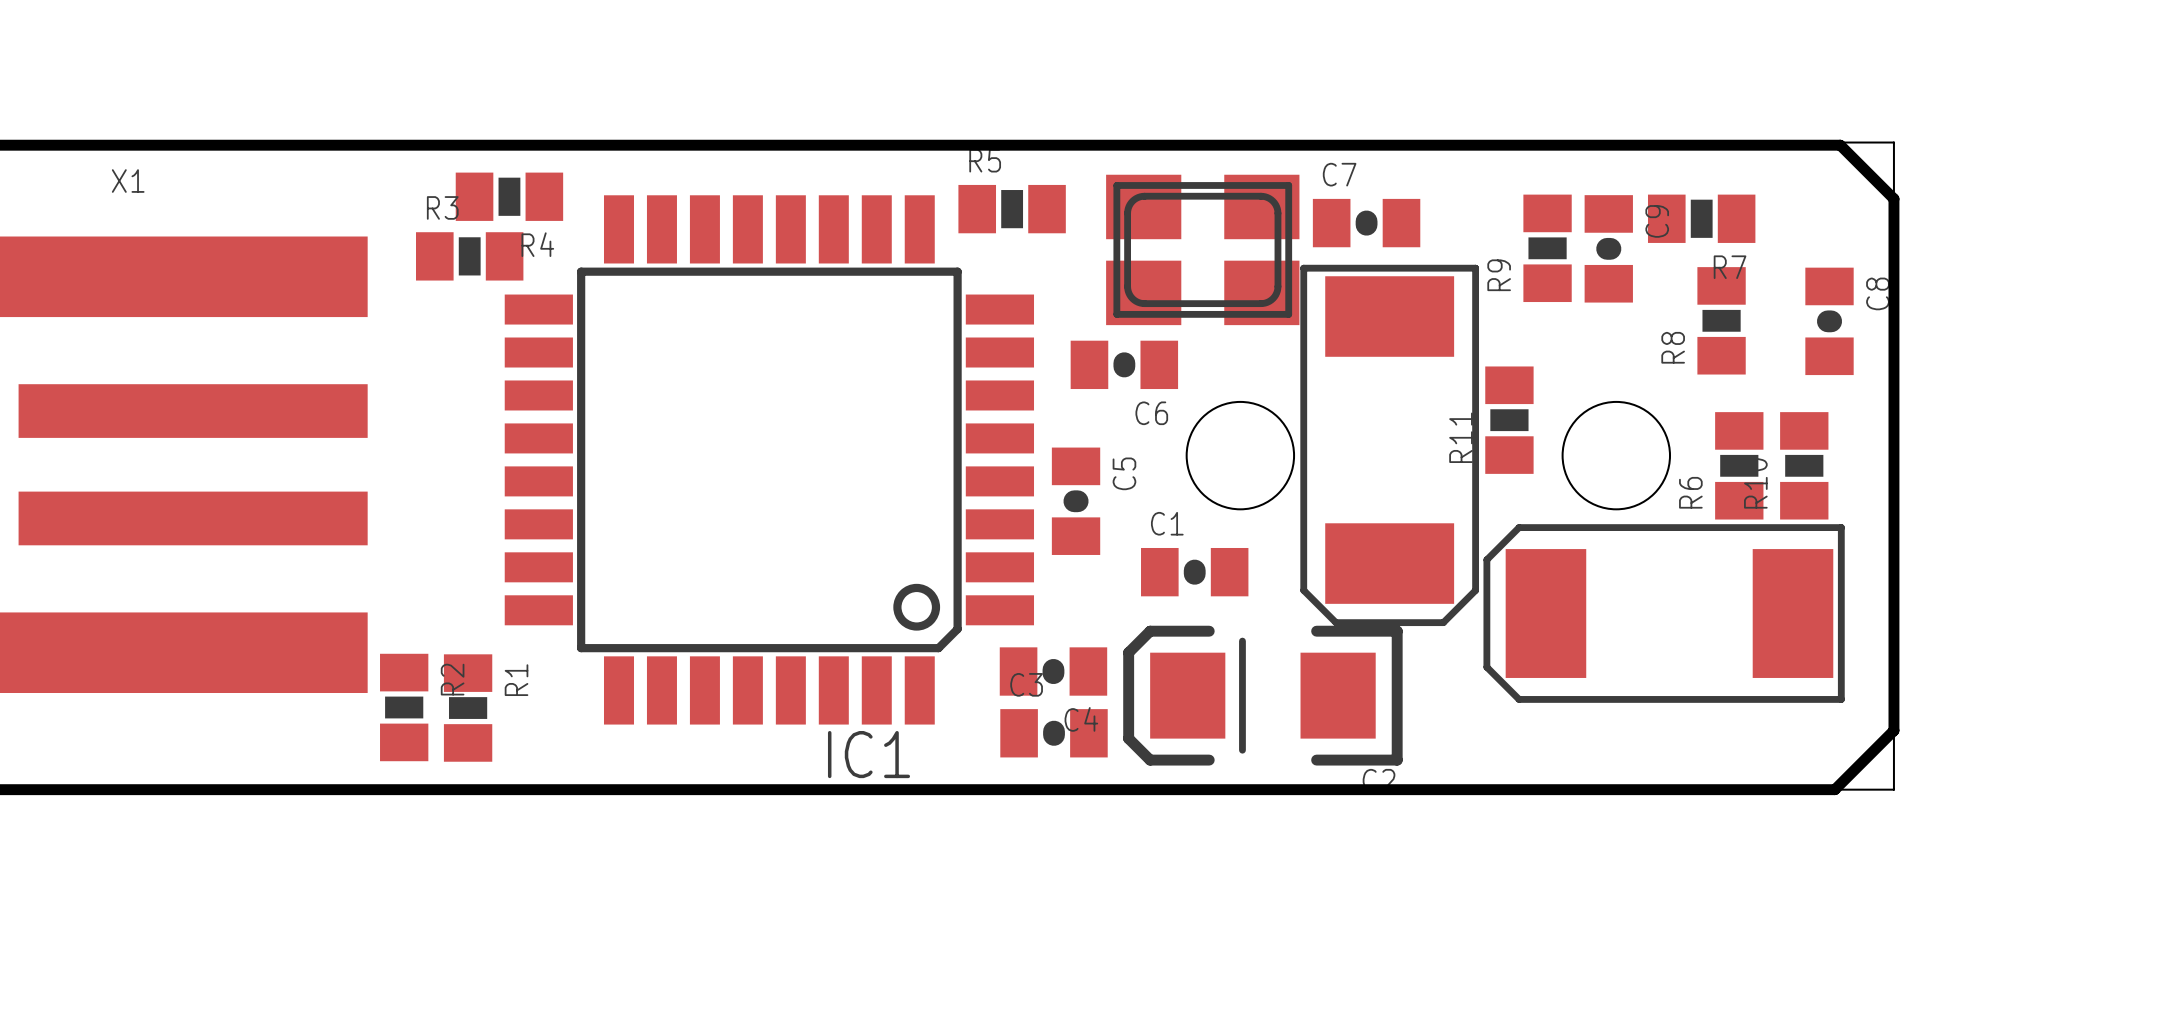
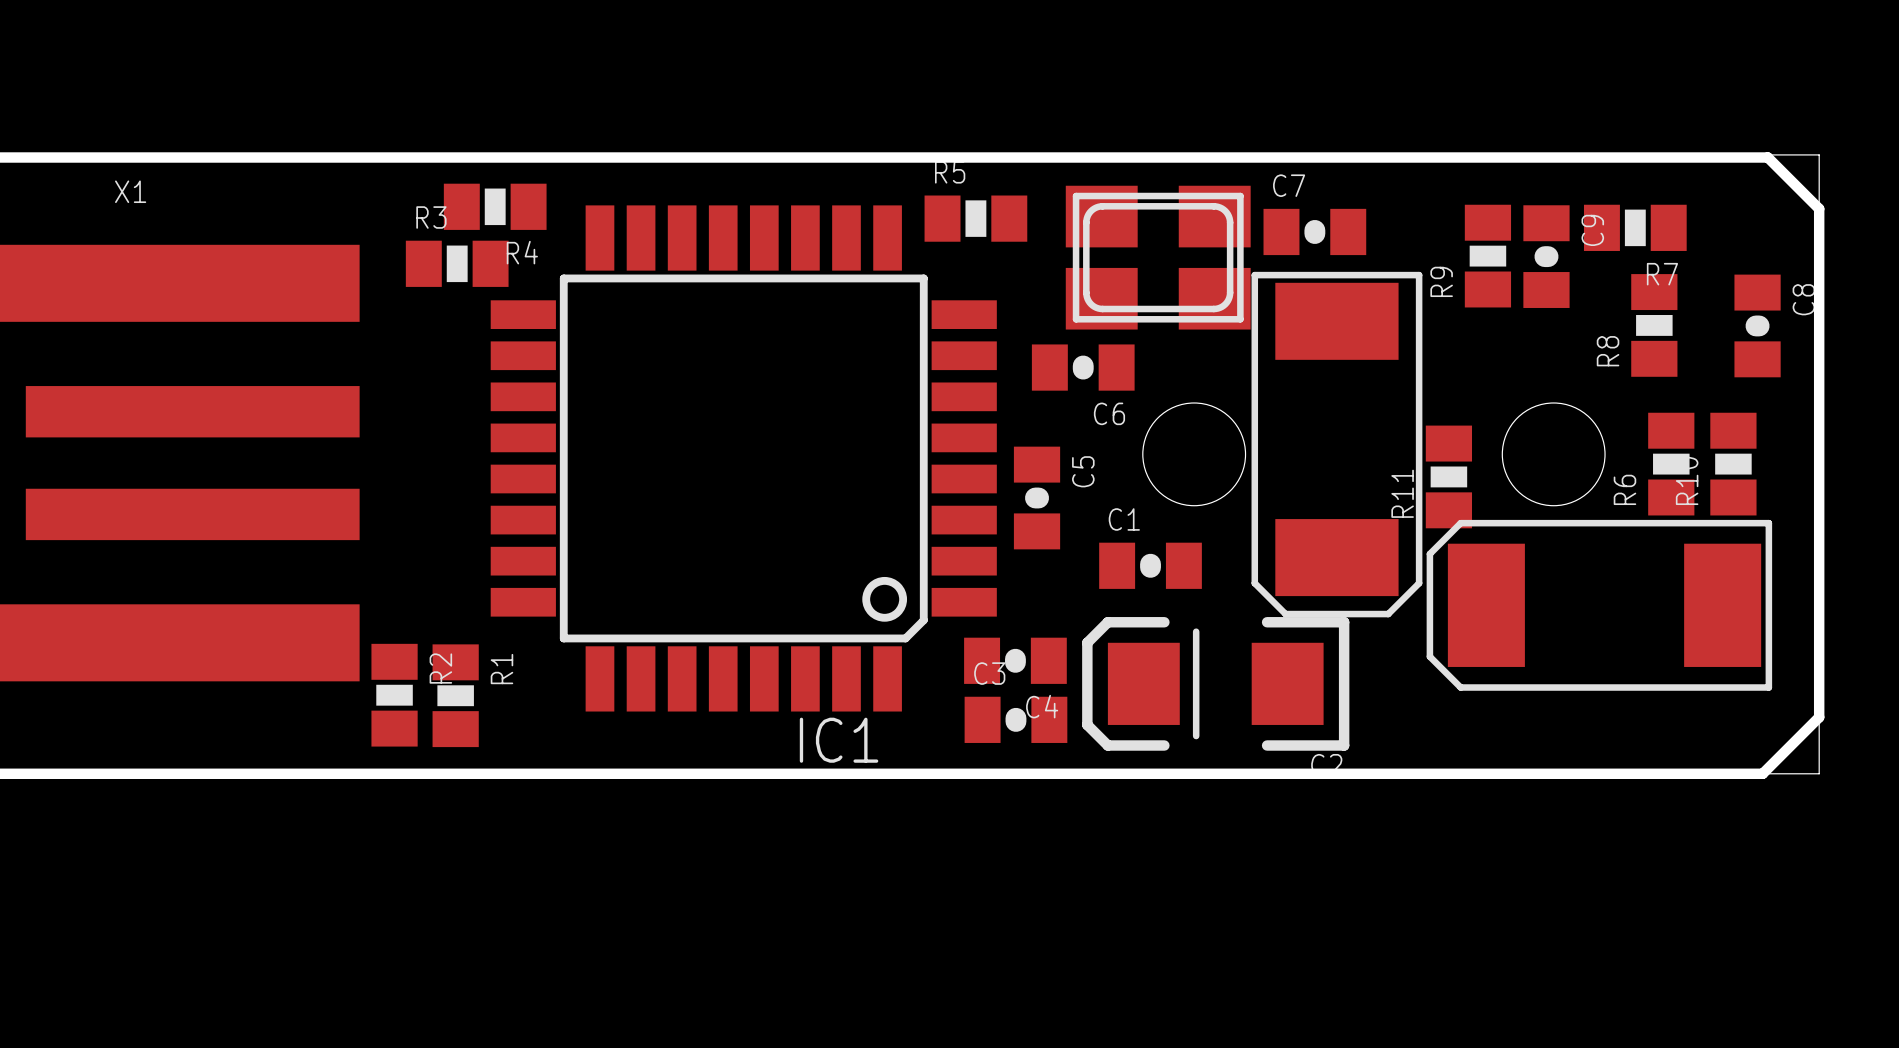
R11 position: (1509, 420) -> (1448, 476)

